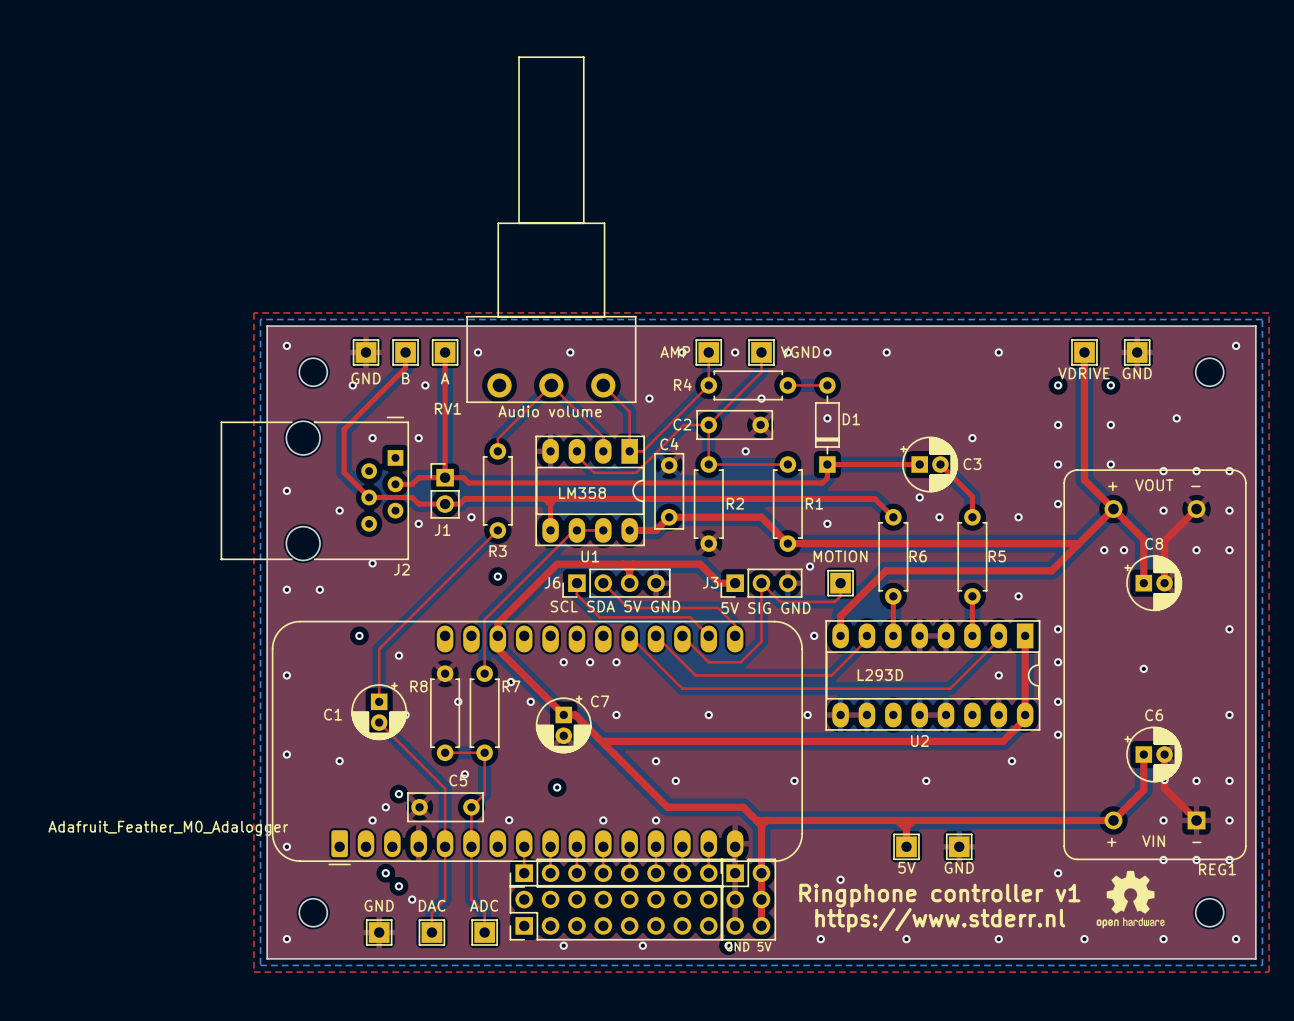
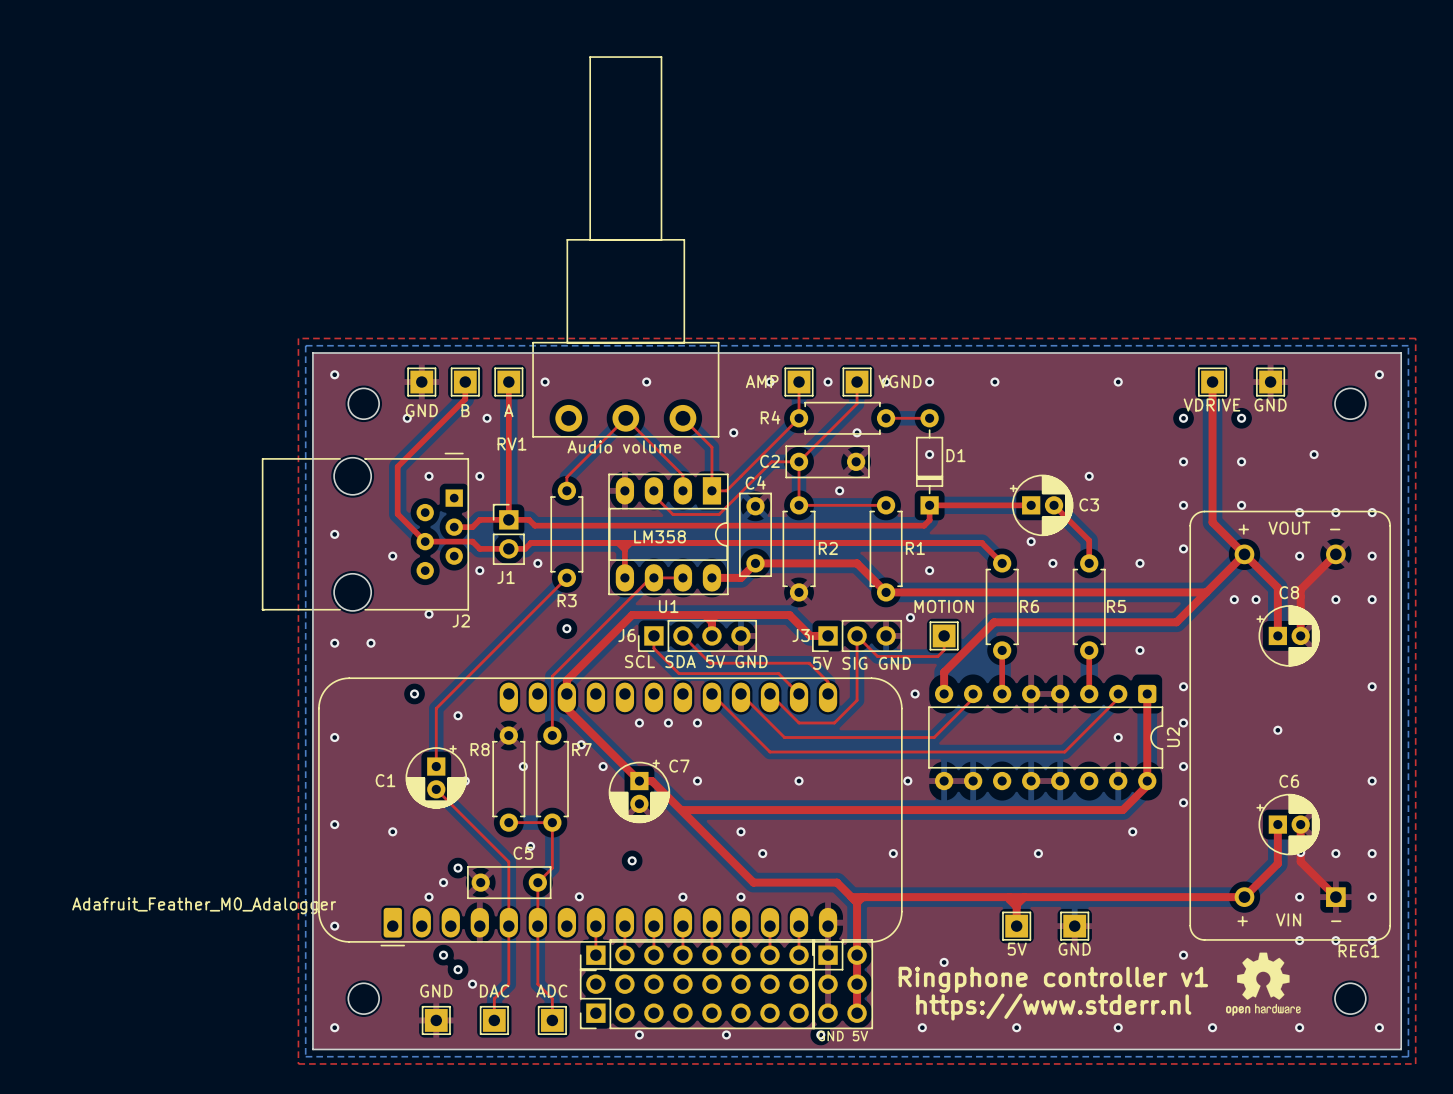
U2 footprint: [825, 620, 1041, 731] -> [928, 684, 1164, 791]
U2 value: L293D (880, 675) -> none
U2 name position: U2 (919, 740) -> U2 (1173, 737)

